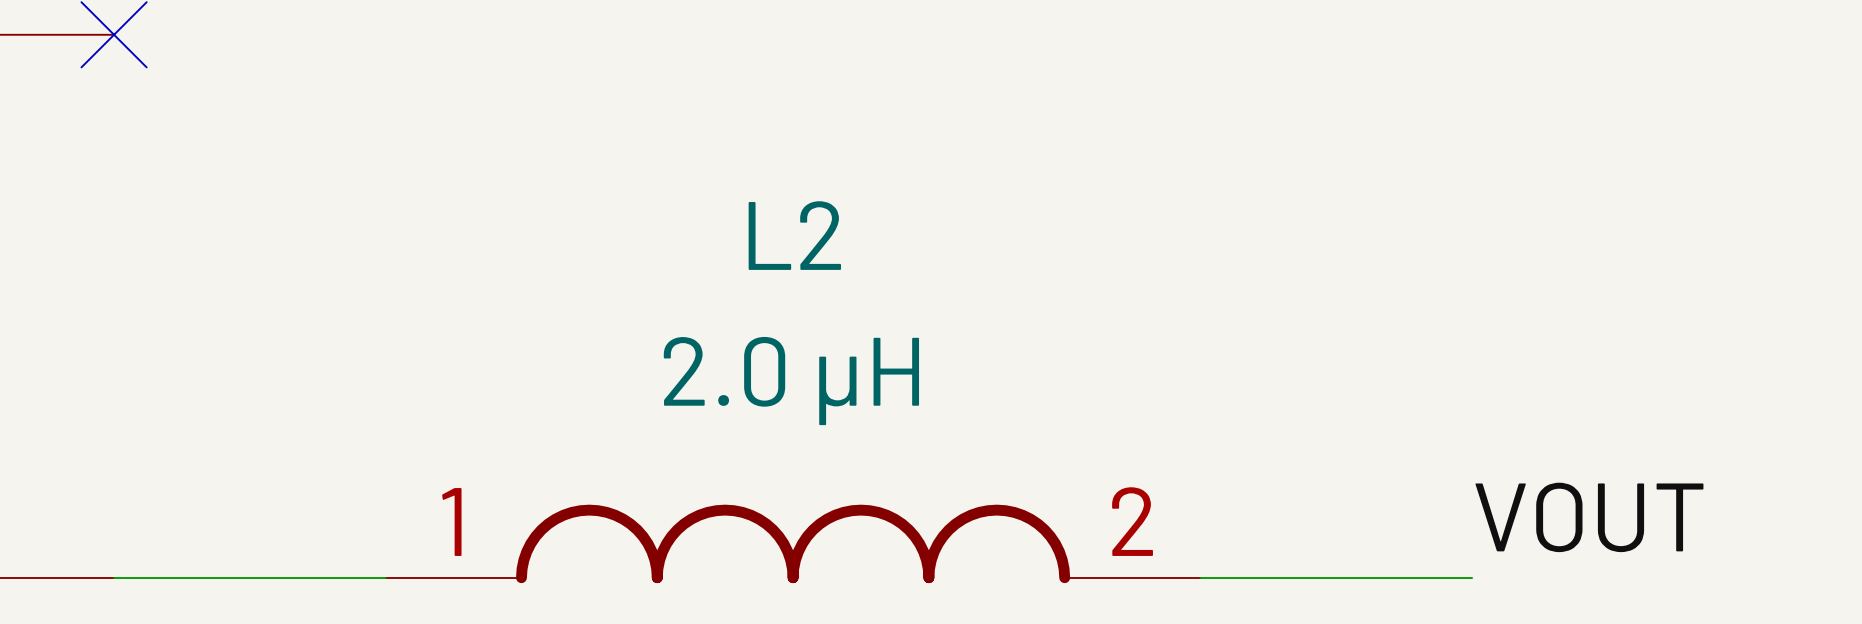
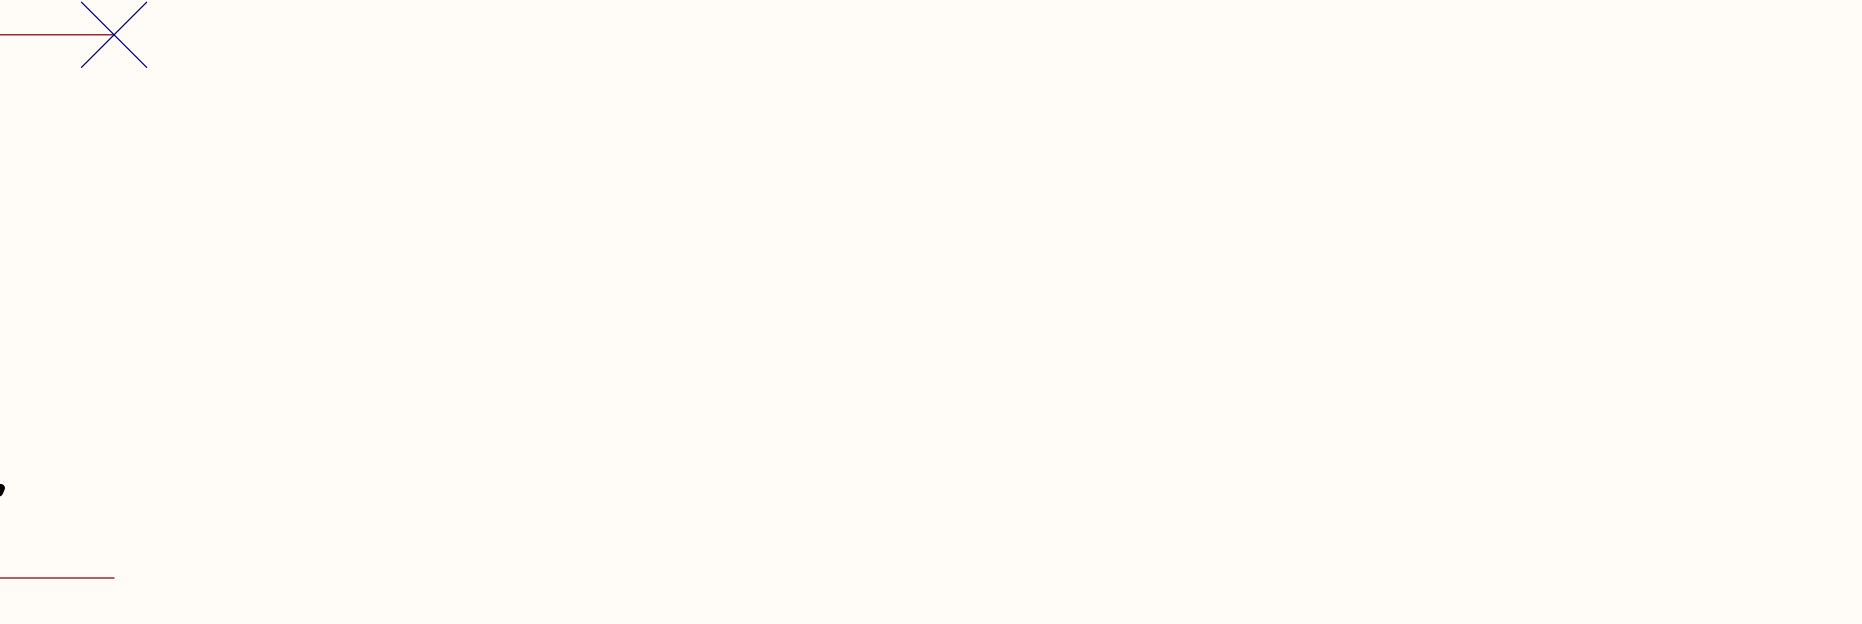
label: VOUT (1589, 517) -> none
L2: 2.0 µH (793, 543) -> none
wire: (114, 578) (385, 578) -> none
wire: (1200, 578) (1472, 578) -> none

